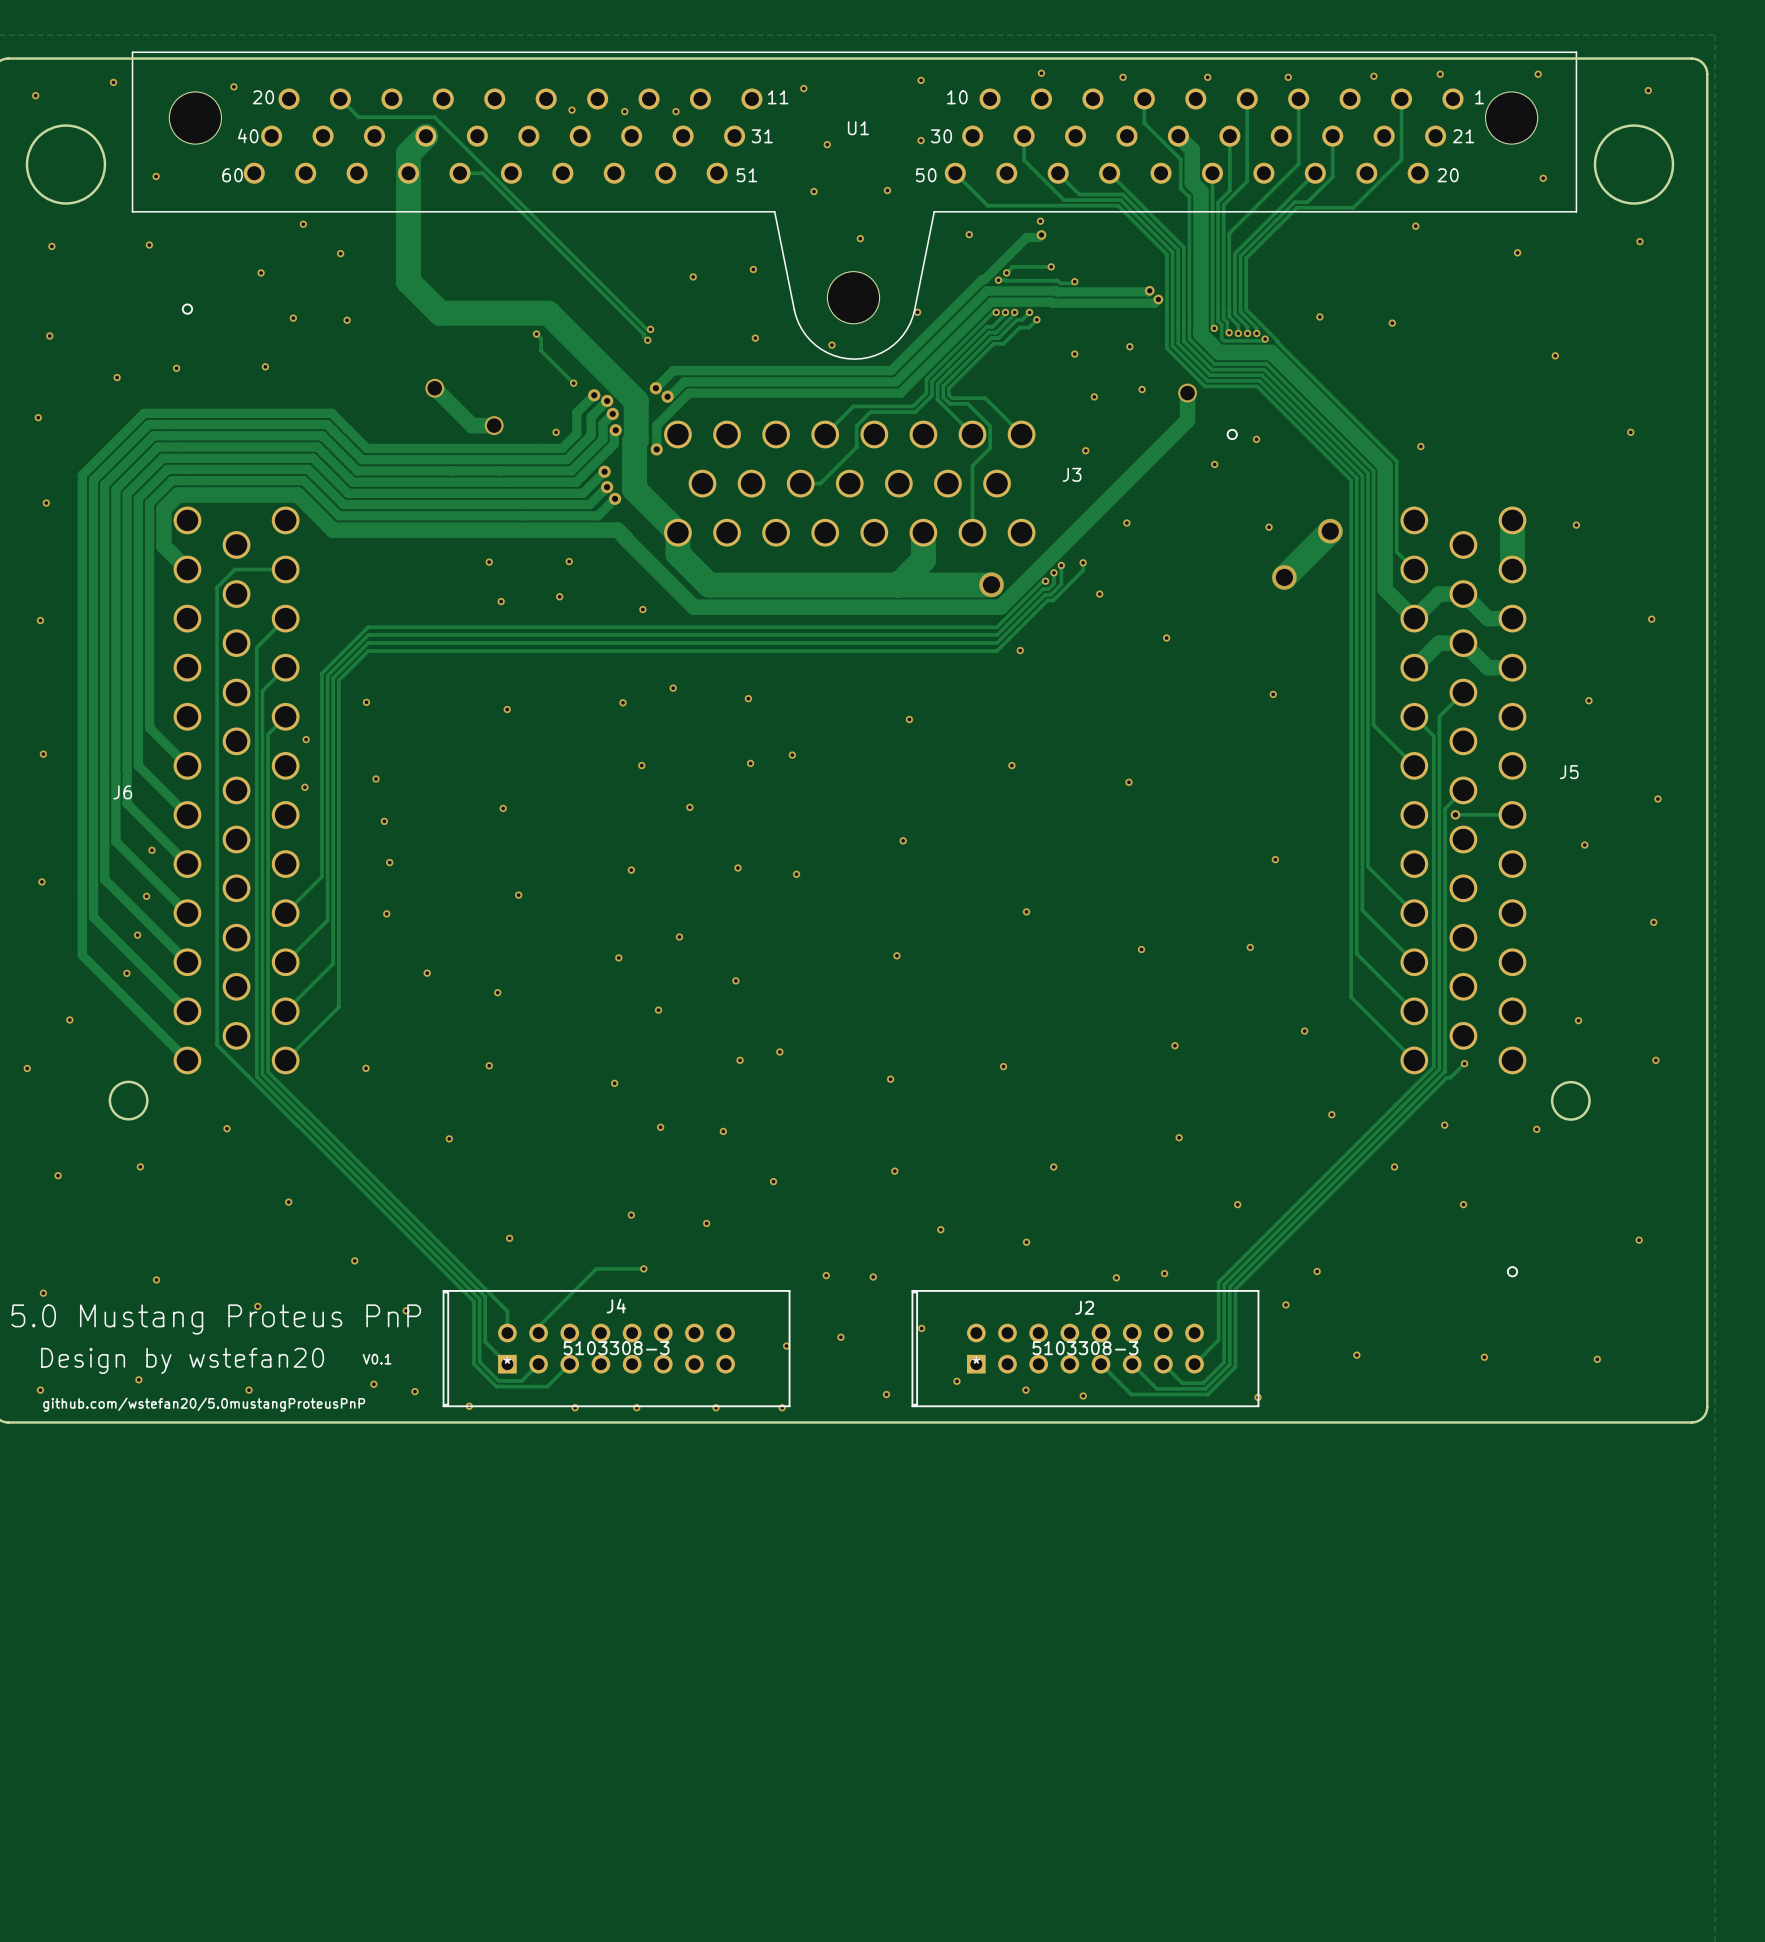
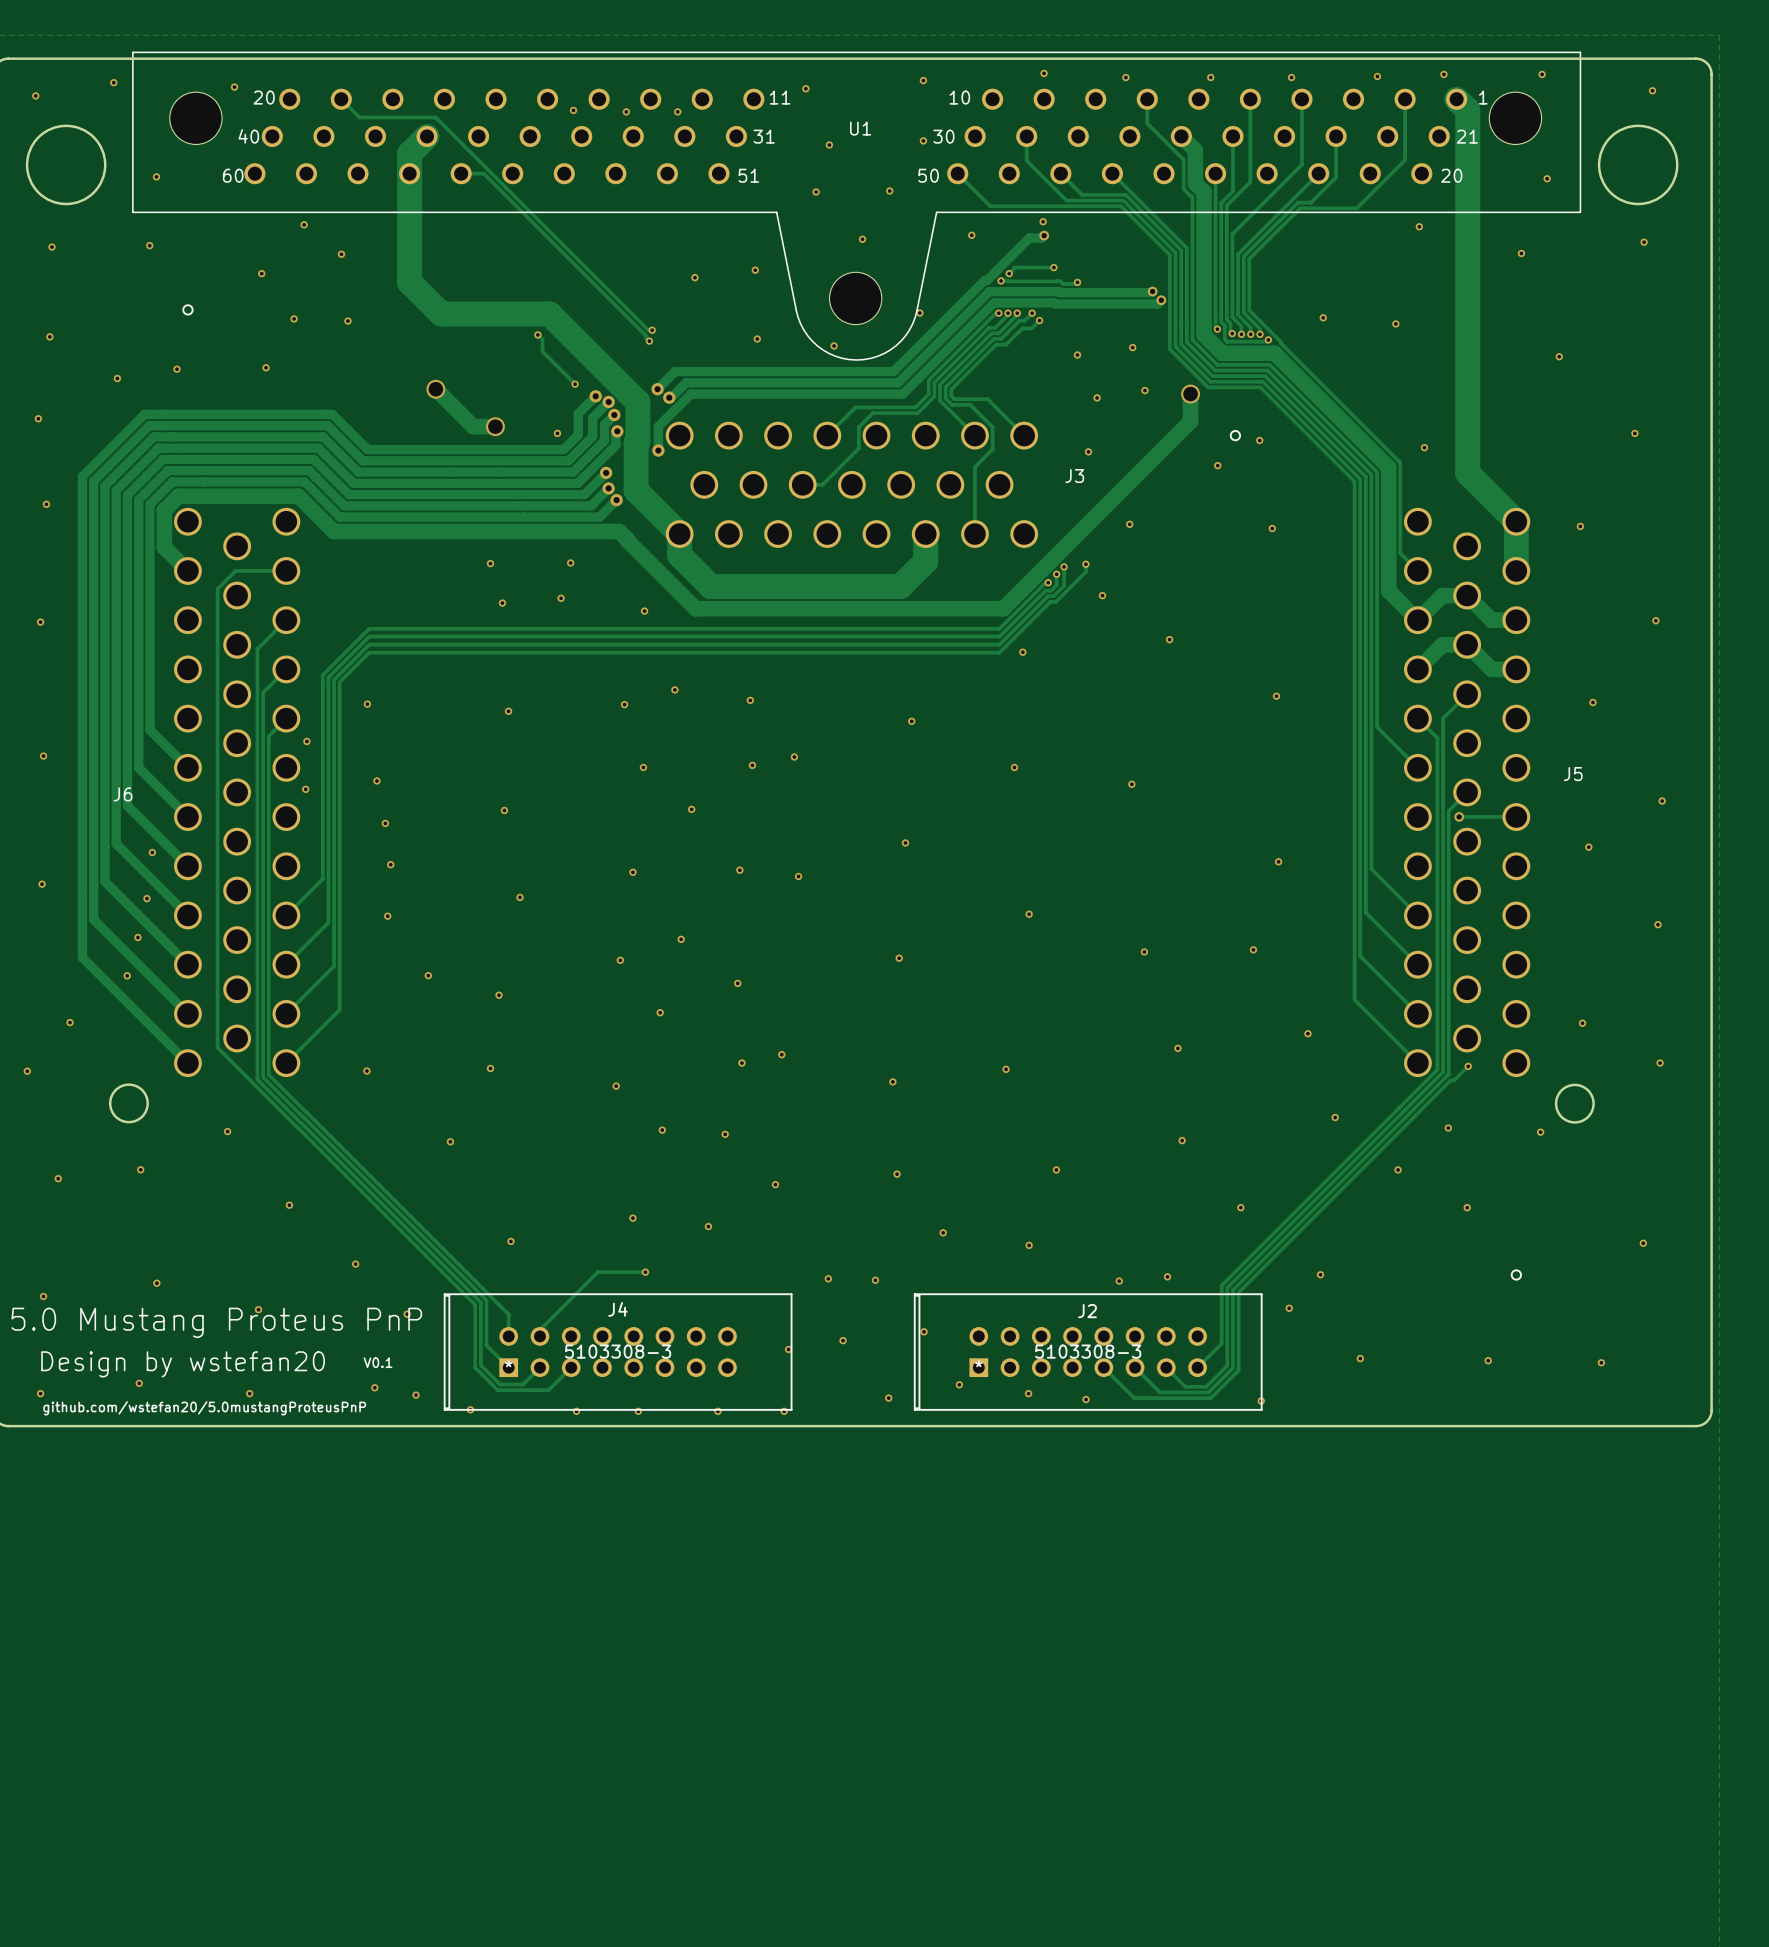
track: none -> (1456, 99) (1467, 110) (1467, 473) (1516, 521)
track: (1330, 531) (1284, 577) -> none
via: (1330, 531) -> none
via: (1284, 577) -> none
track: (991, 584) (898, 585) -> none
via: (991, 584) -> none

